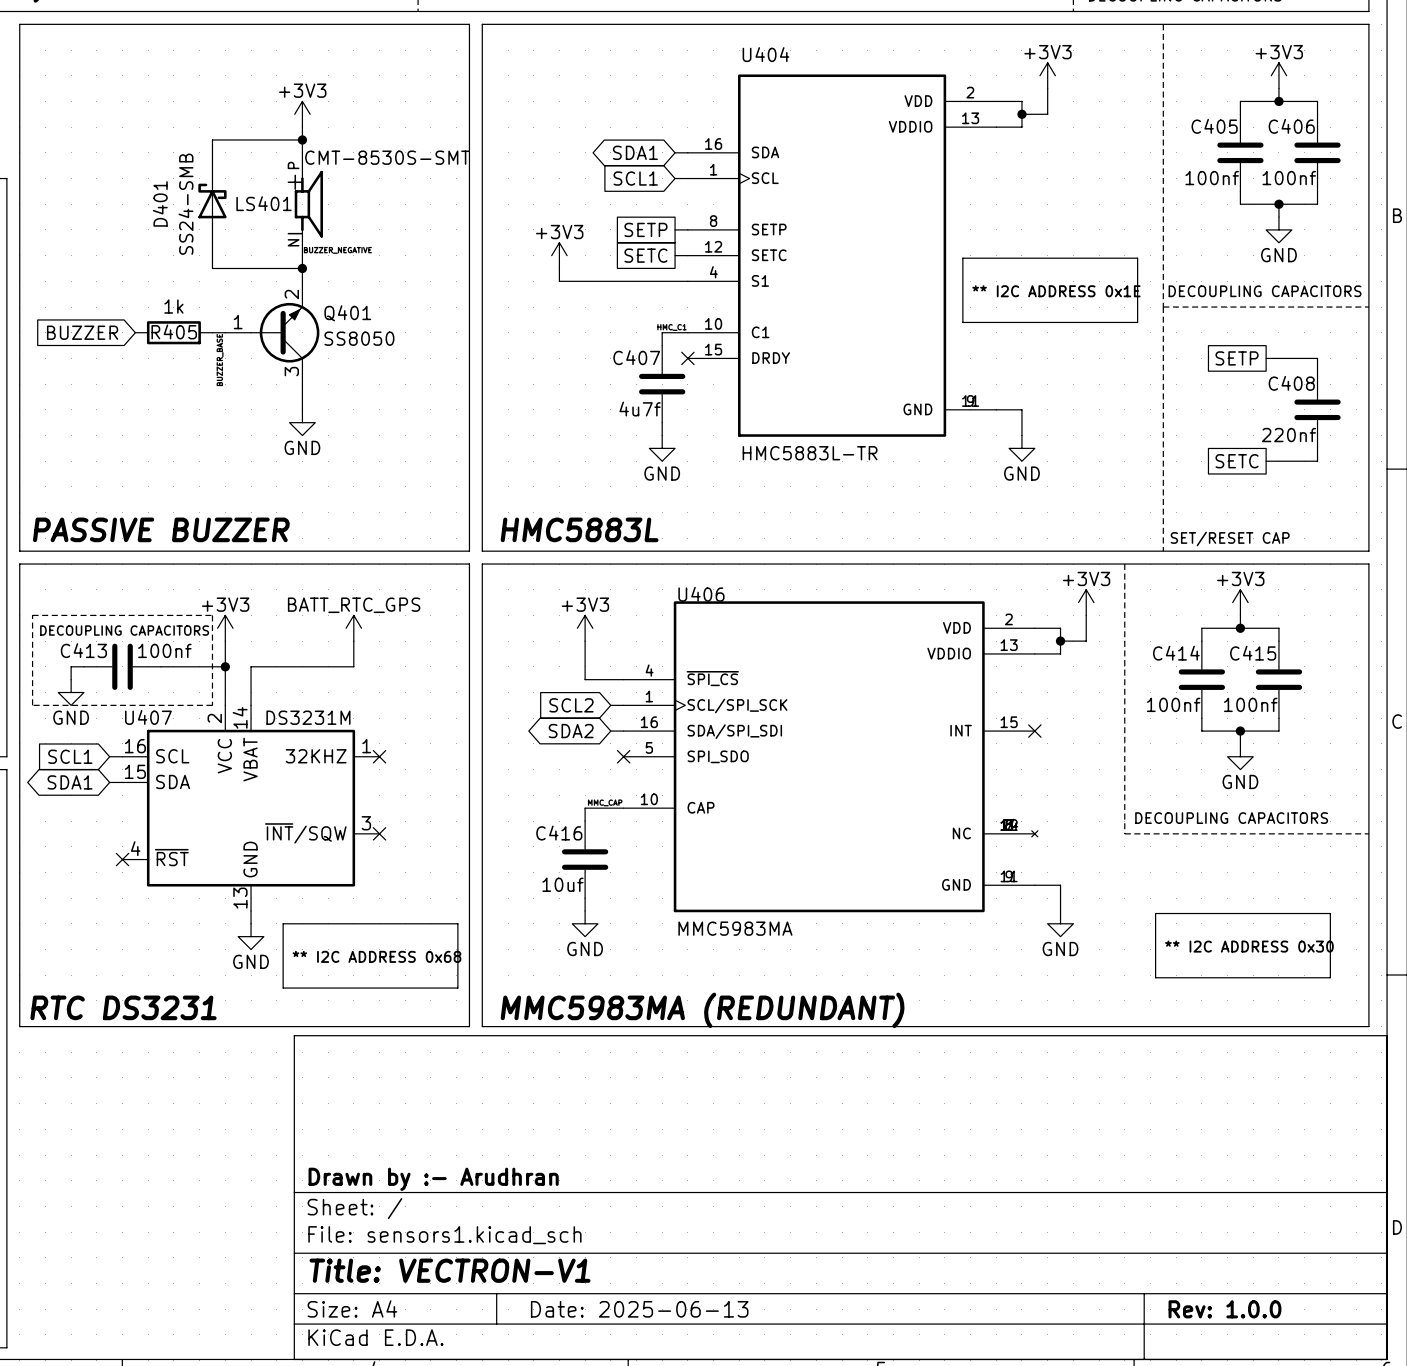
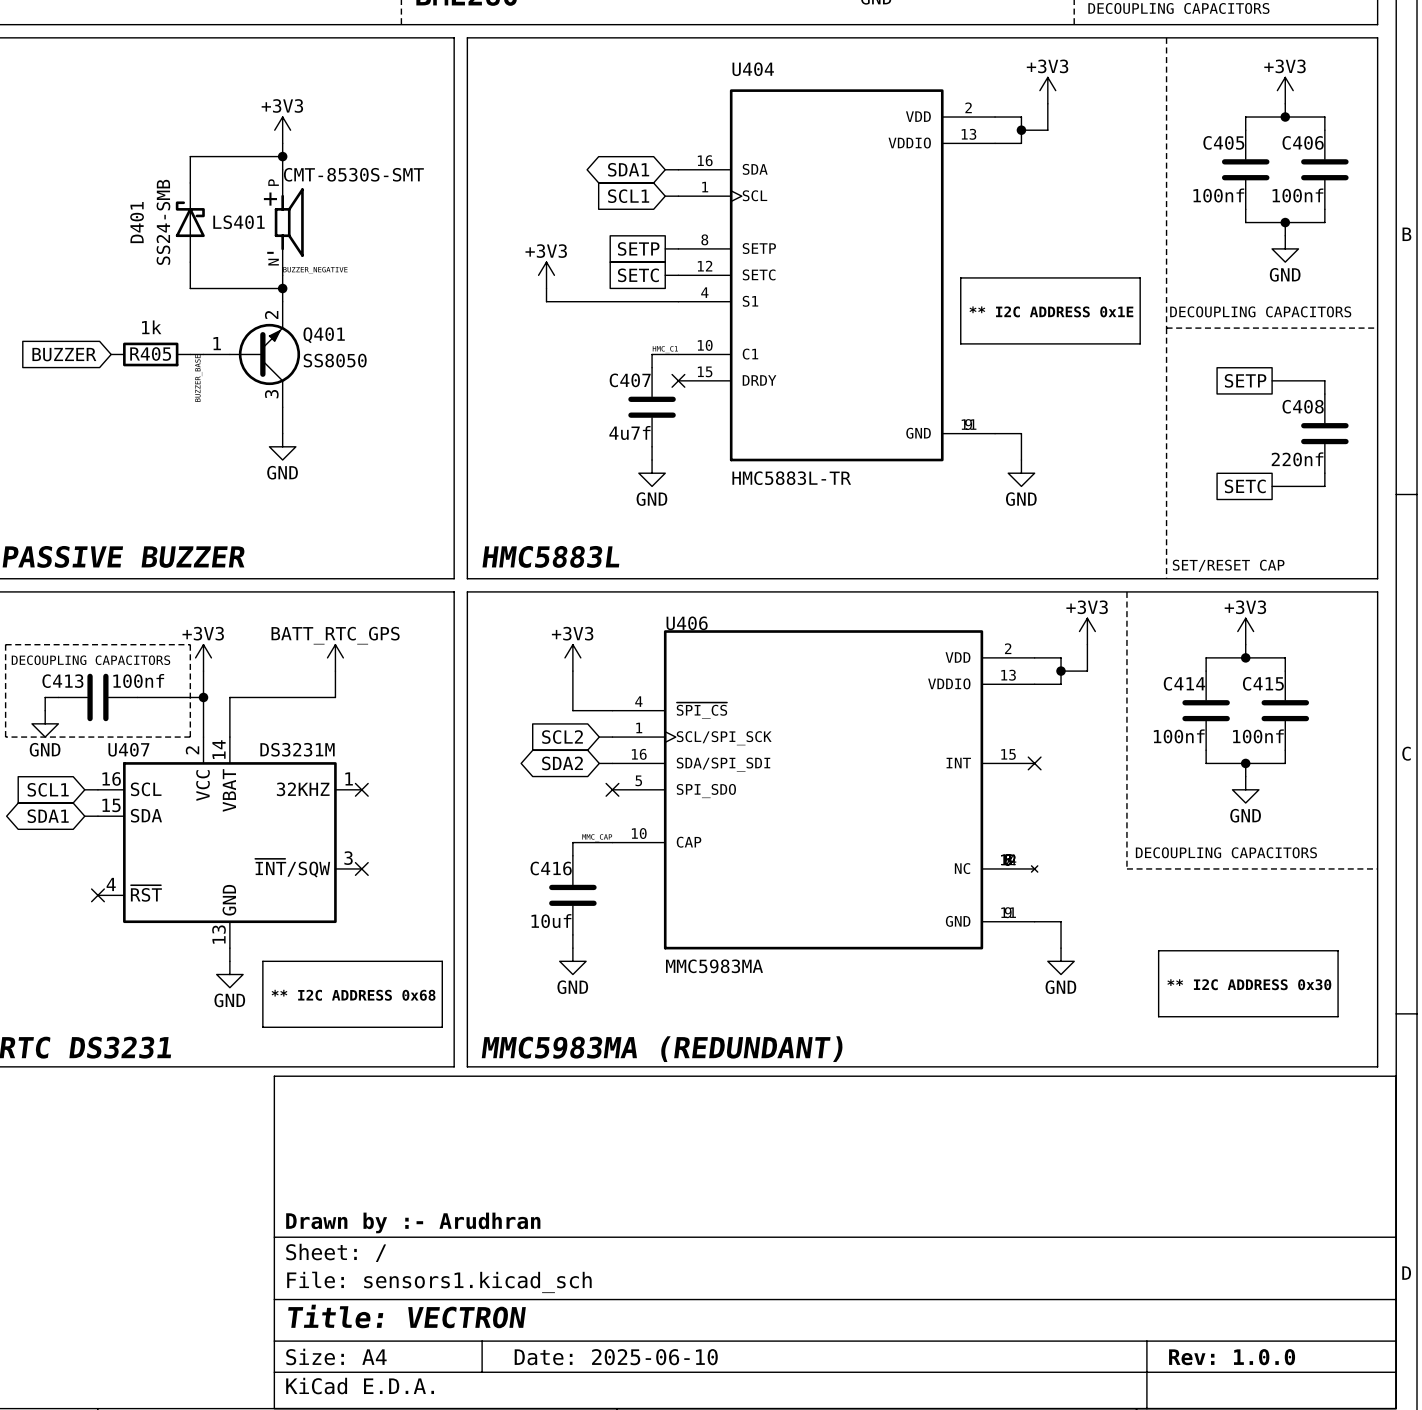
title block: Title: VECTRON-V1 (450, 1270) -> Title: VECTRON (406, 1316)
title block: Date: 2025-06-13 (639, 1309) -> Date: 2025-06-10 (616, 1357)

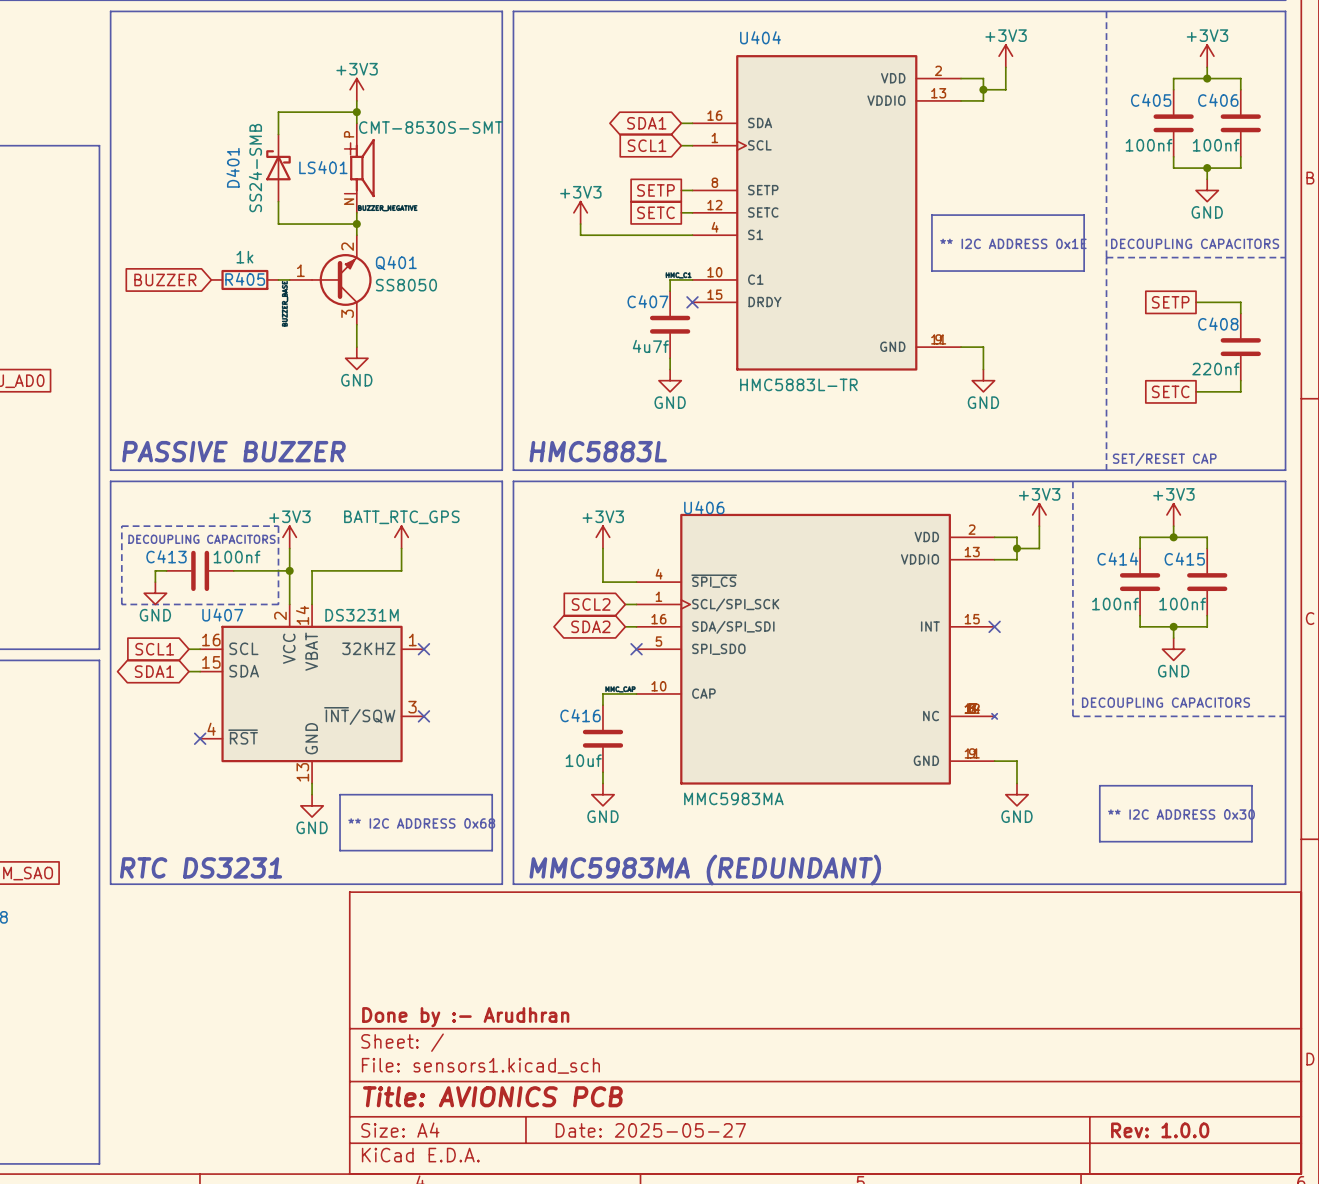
title block: Drawn by :- Arudhran (413, 1222) -> Done by :- Arudhran (465, 1017)
title block: Title: VECTRON (406, 1316) -> Title: AVIONICS PCB (492, 1096)
title block: Date: 2025-06-10 (616, 1357) -> Date: 2025-05-27 (650, 1130)

